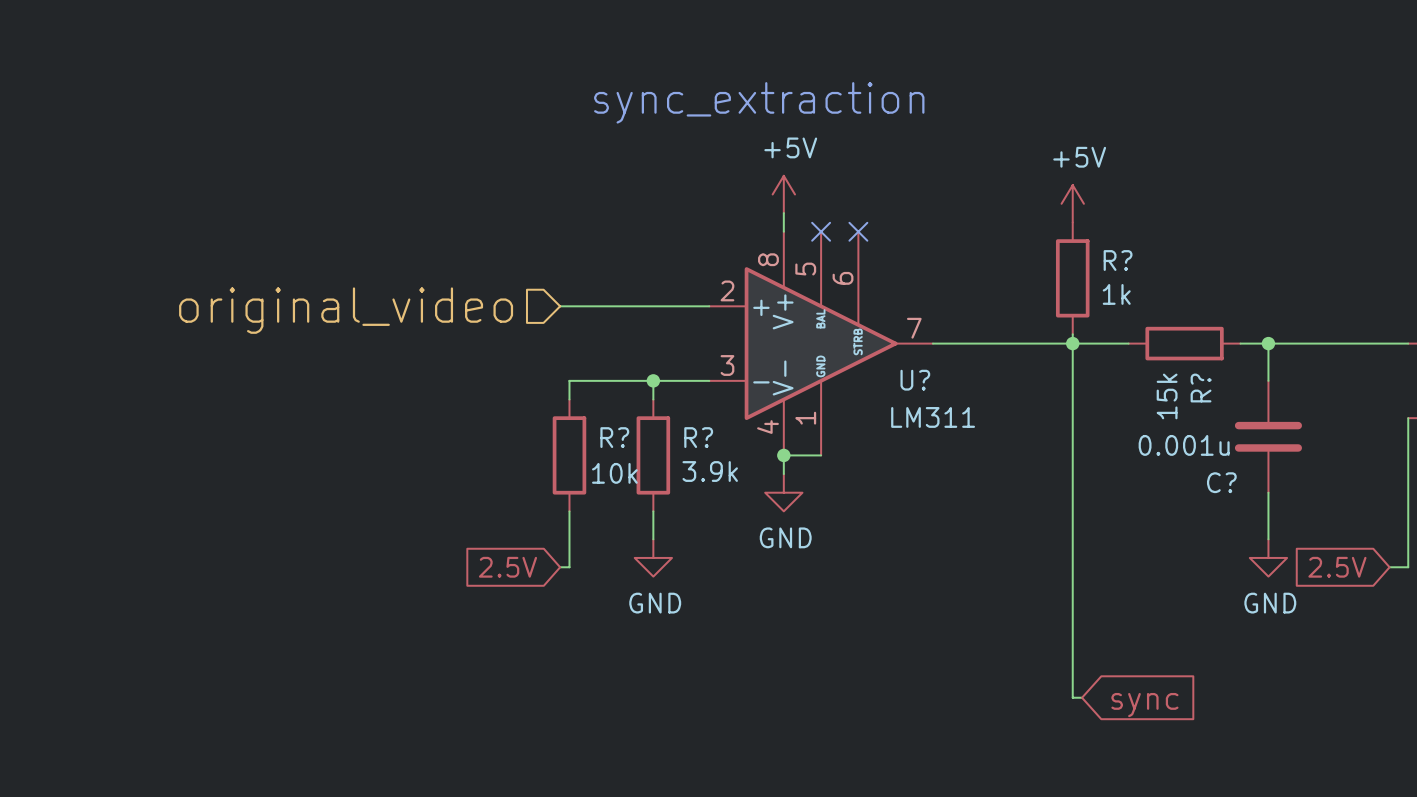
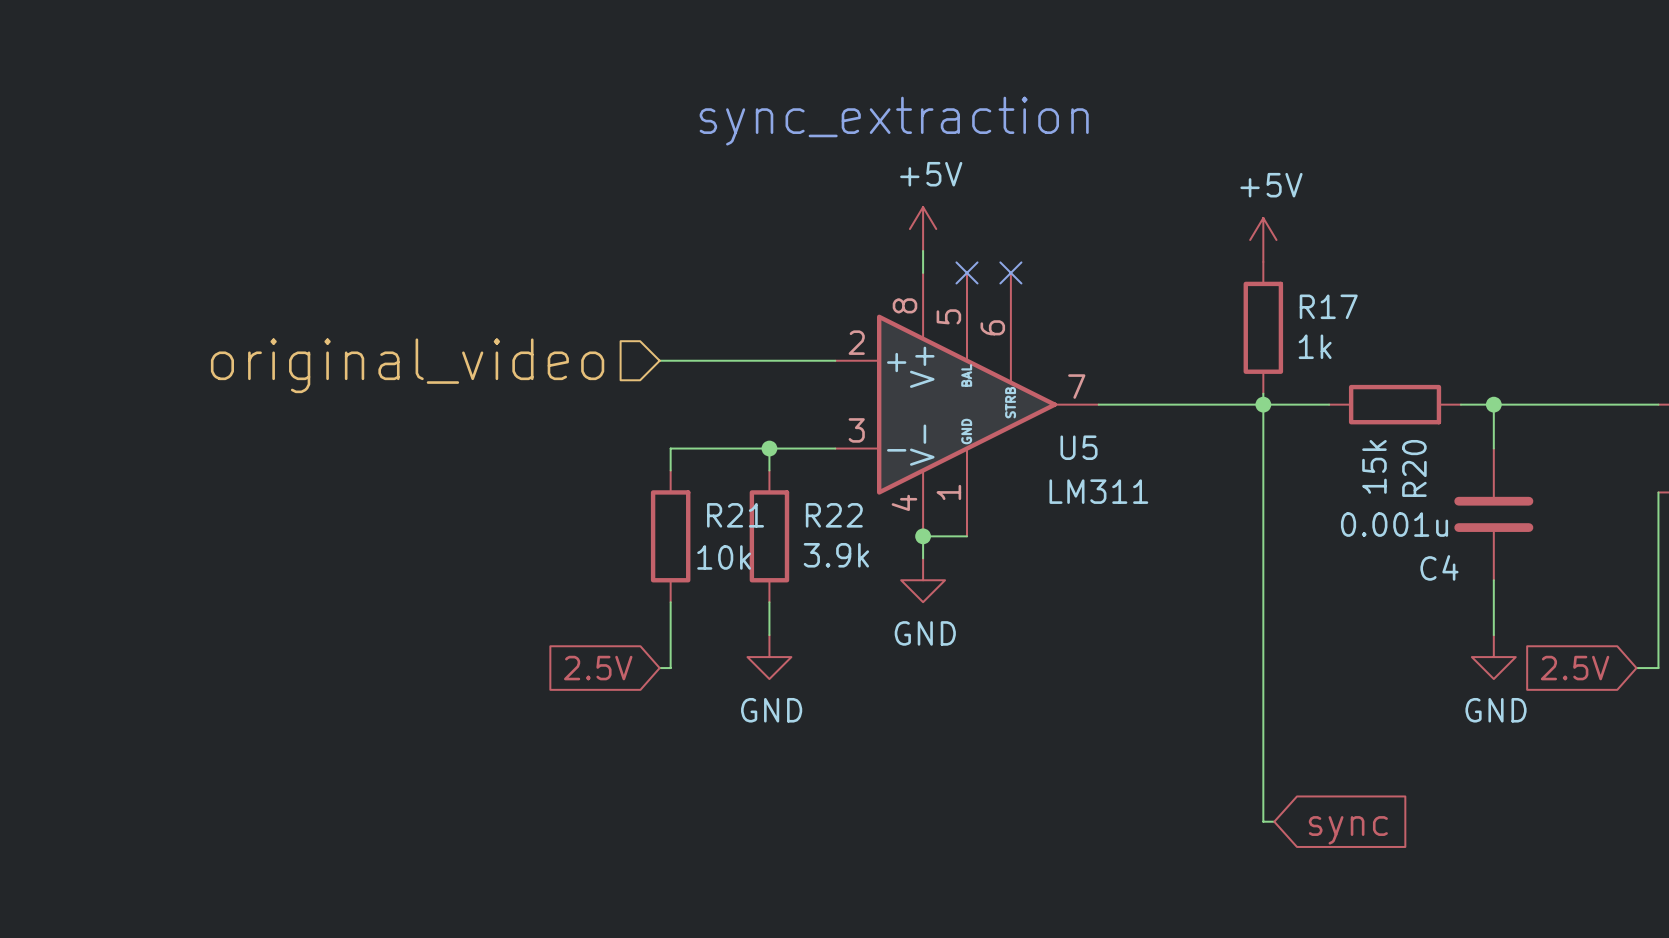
R? name: R? (1118, 260) -> R17 (1328, 306)
U? name: U? (915, 380) -> U5 (1079, 447)
R? name: R? (1201, 388) -> R20 (1414, 468)
R? name: R? (614, 437) -> R21 (735, 515)
R? name: R? (698, 437) -> R22 (834, 515)
C? name: C? (1221, 482) -> C4 (1439, 567)

